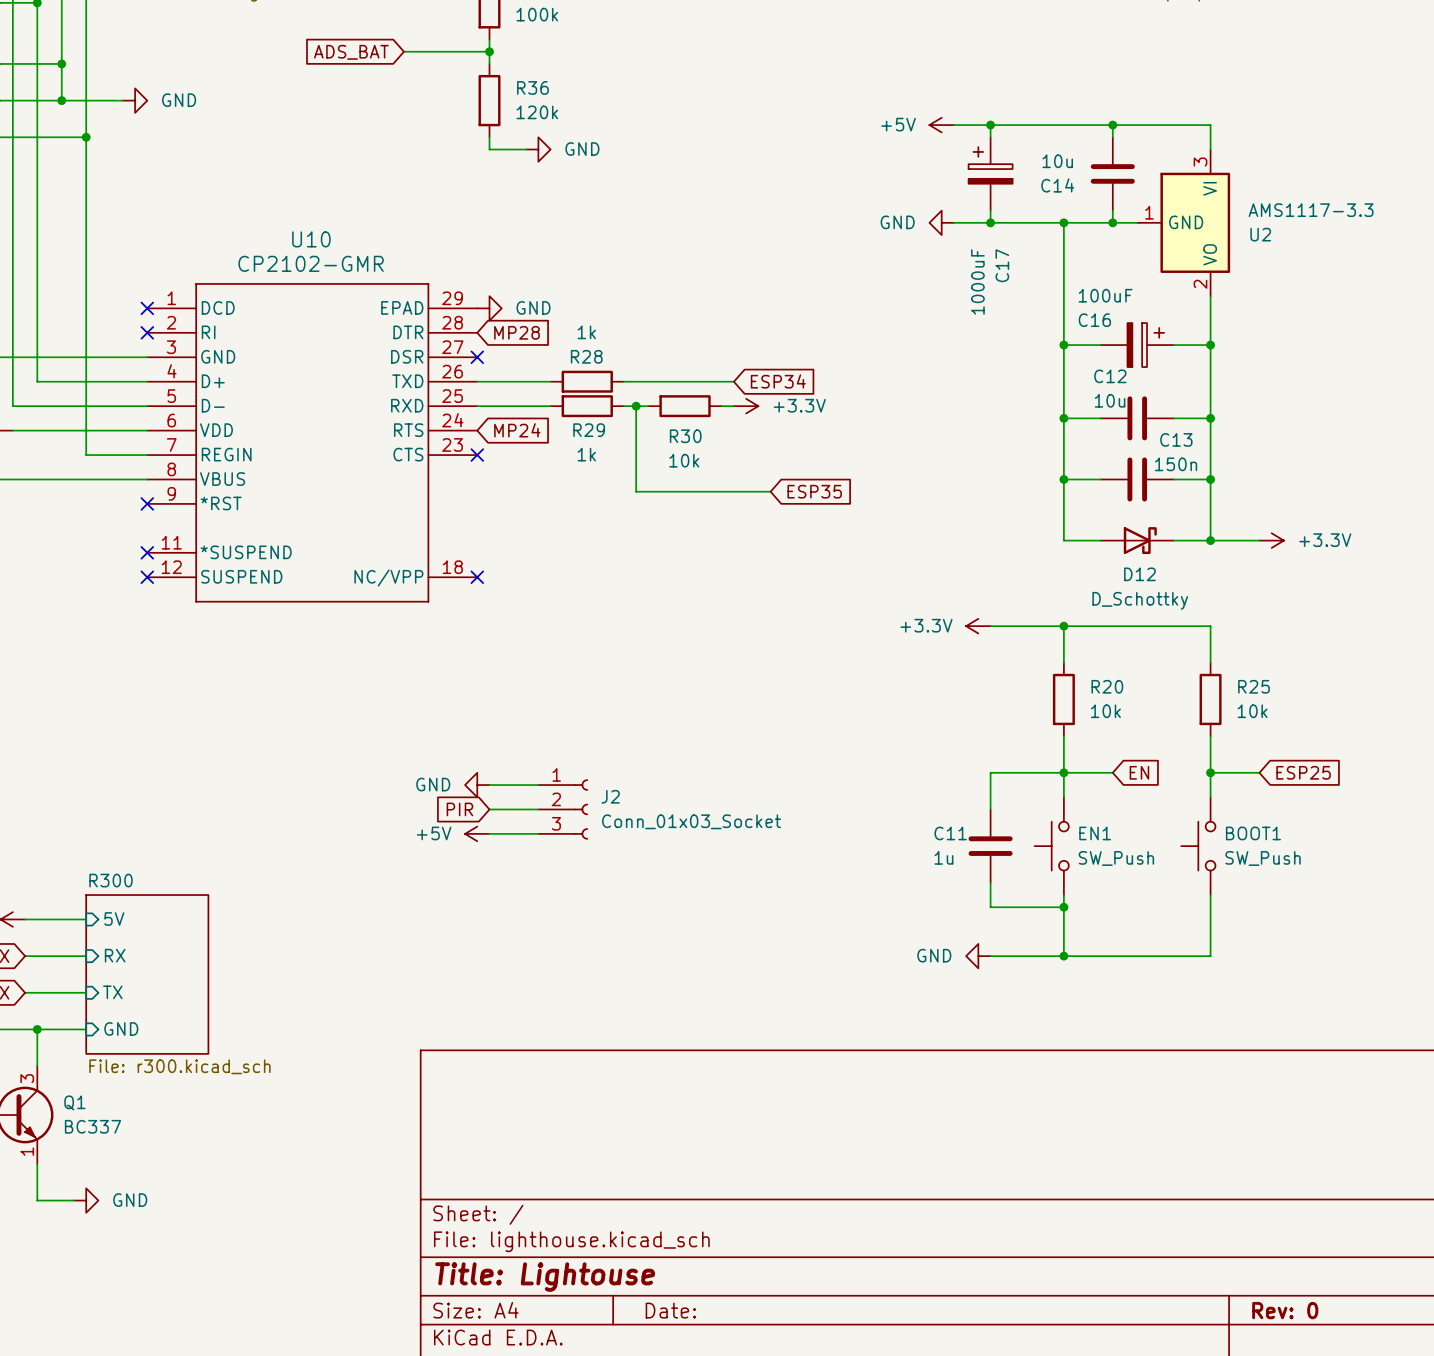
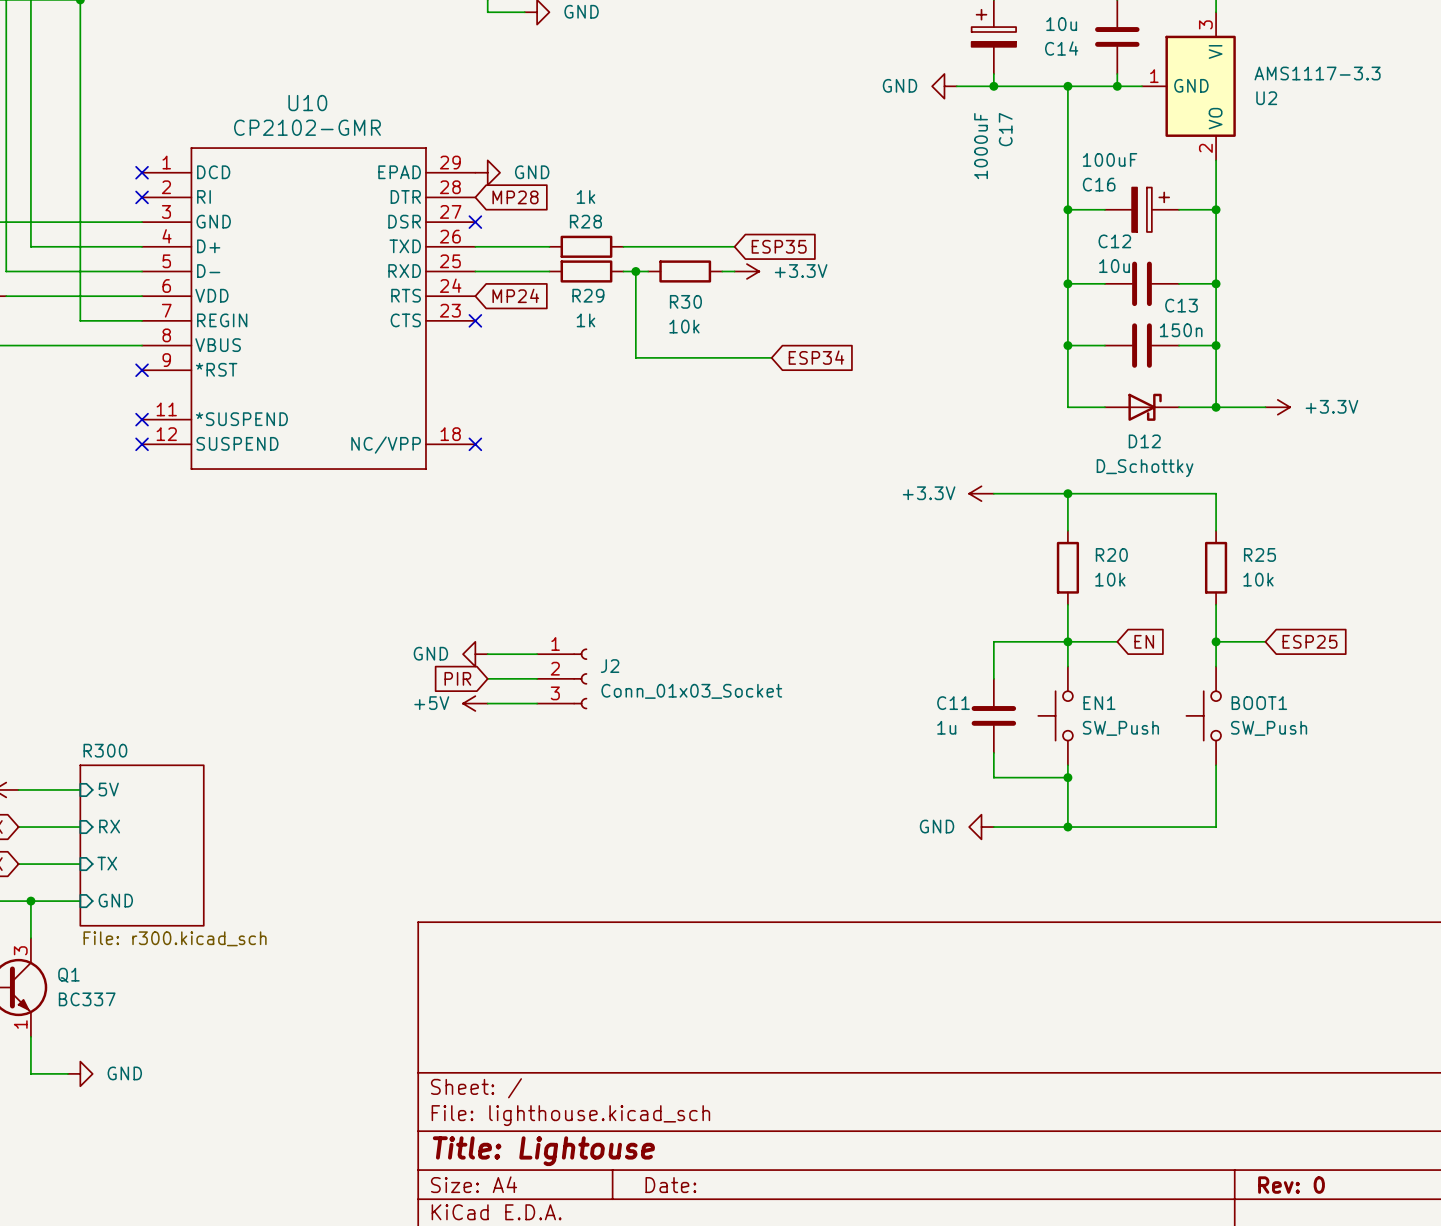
global label: ESP34 (778, 381) -> ESP35 (779, 246)
global label: ESP35 (814, 491) -> ESP34 (816, 357)

